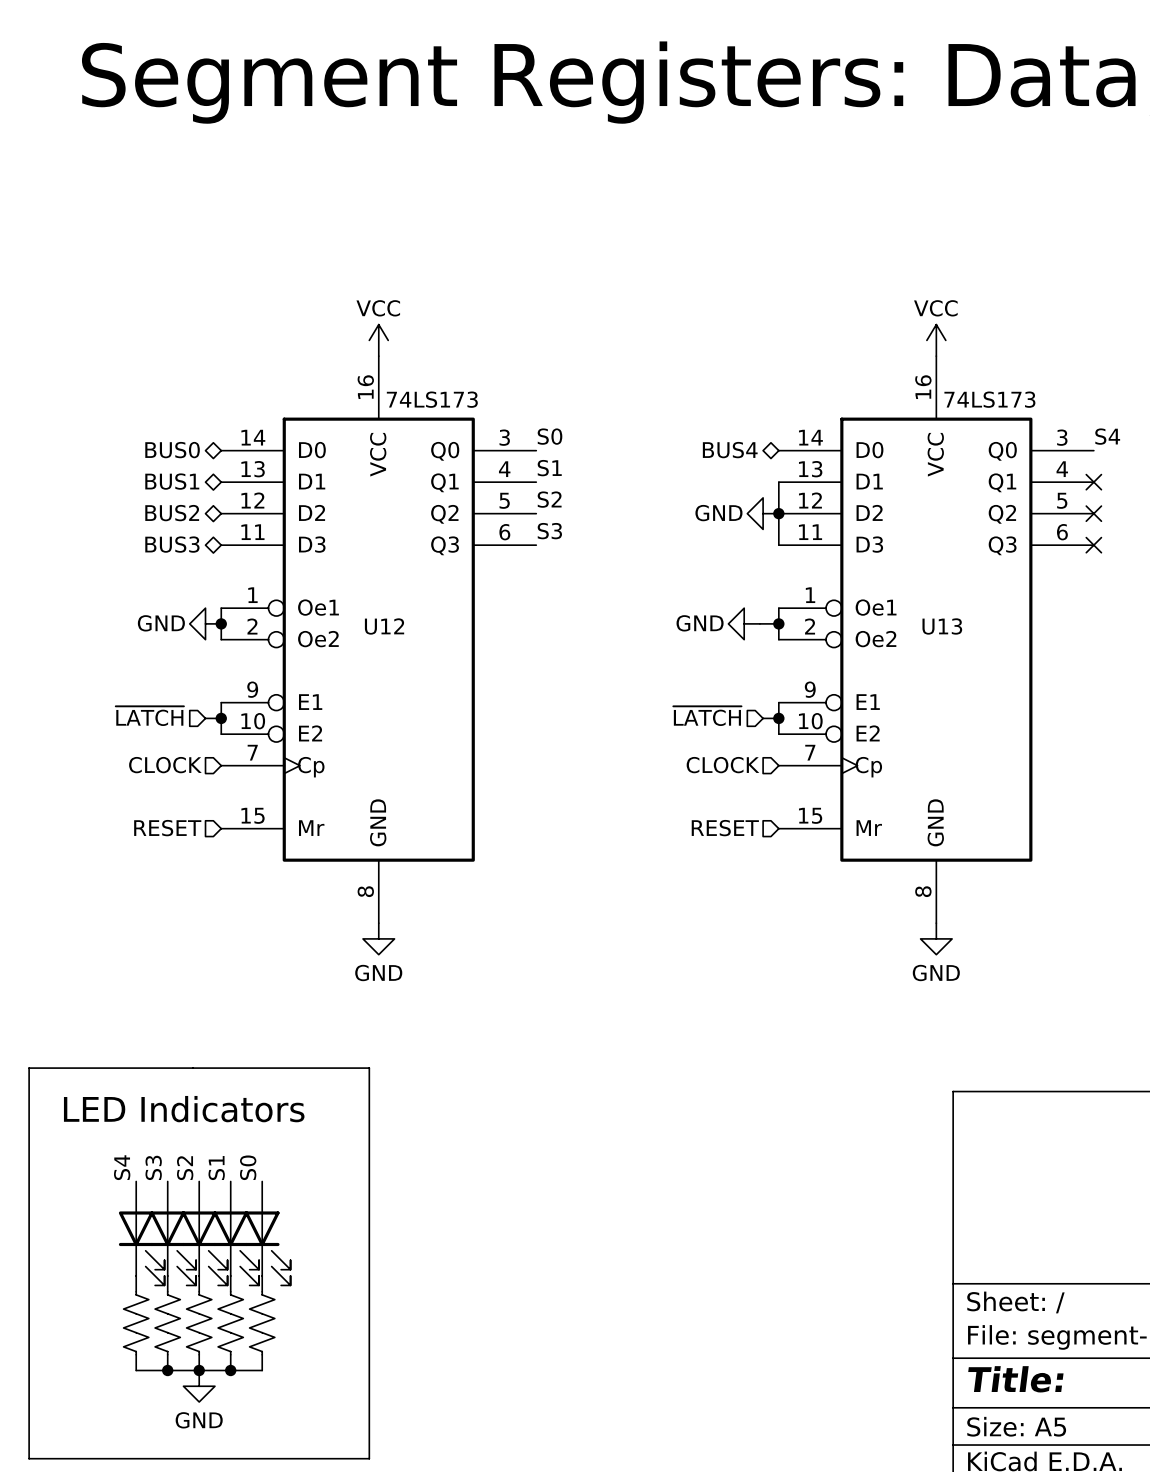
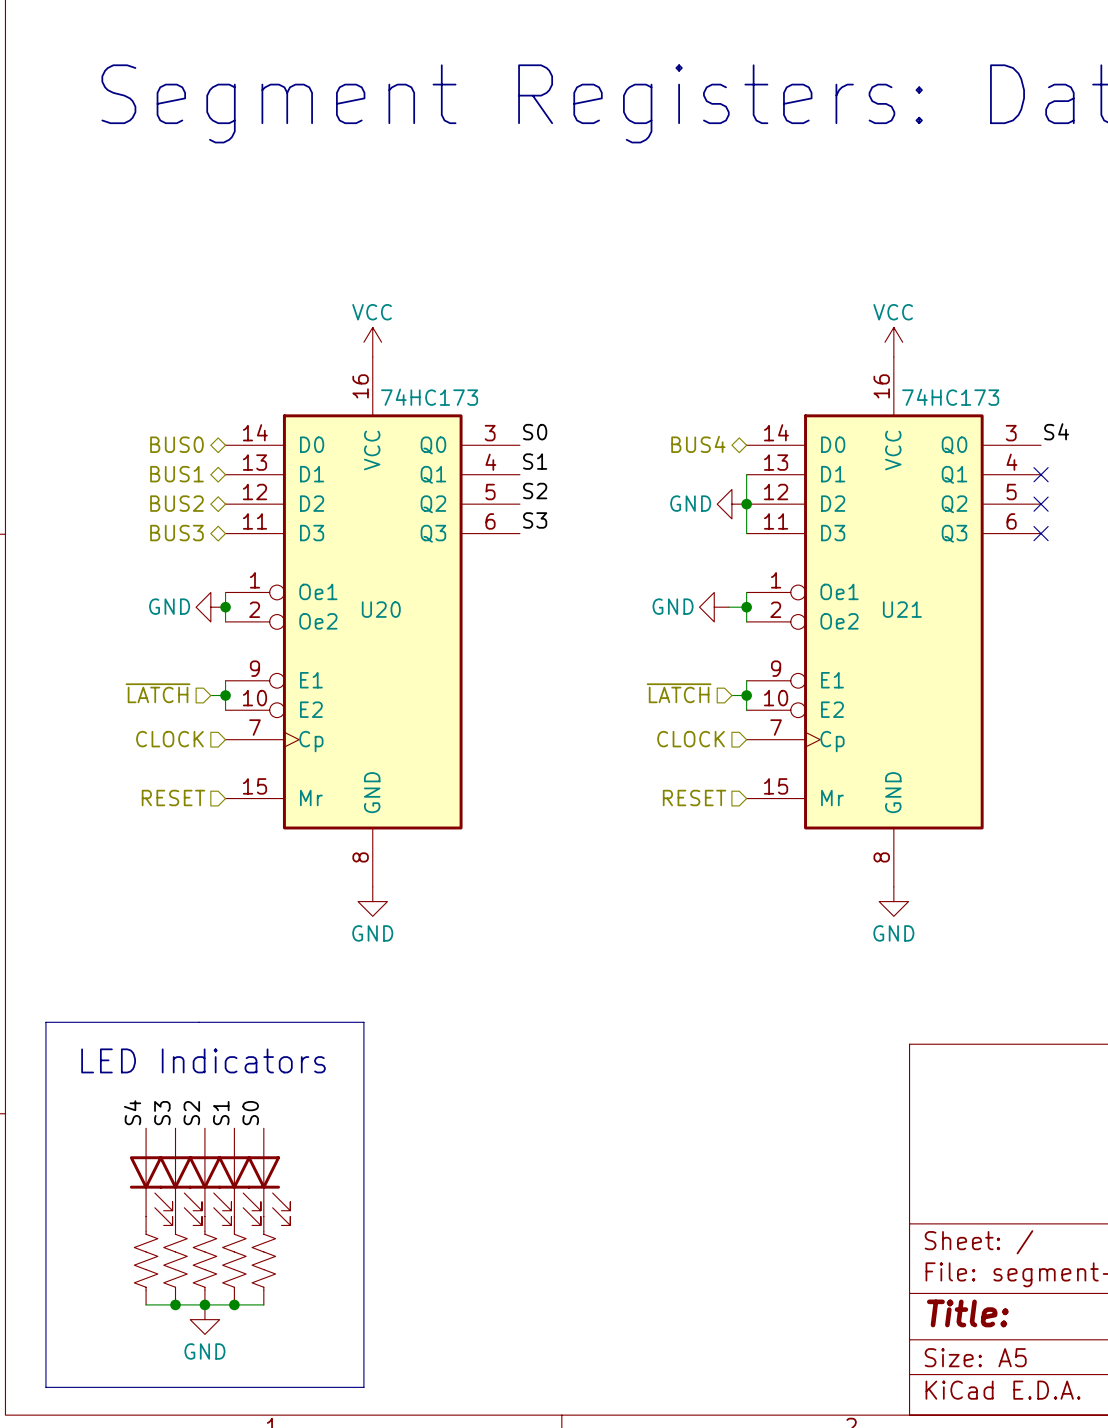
U12 value: 74LS173 (432, 399) -> 74HC173 (429, 397)
U13 value: 74LS173 (989, 399) -> 74HC173 (950, 397)
U12 name: U12 (384, 626) -> U20 (381, 609)
U13 name: U13 (942, 626) -> U21 (902, 609)

